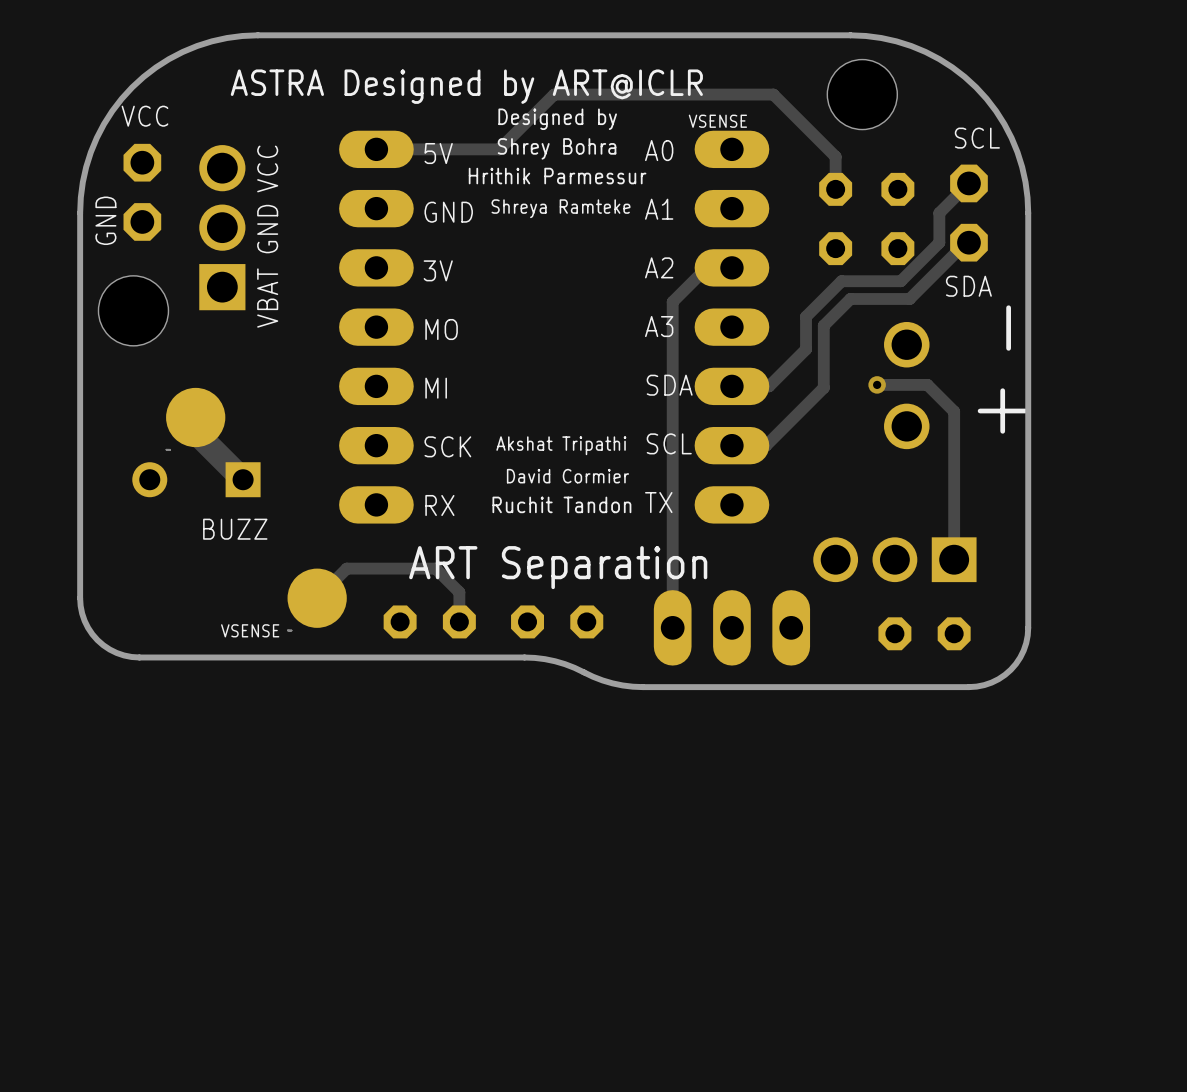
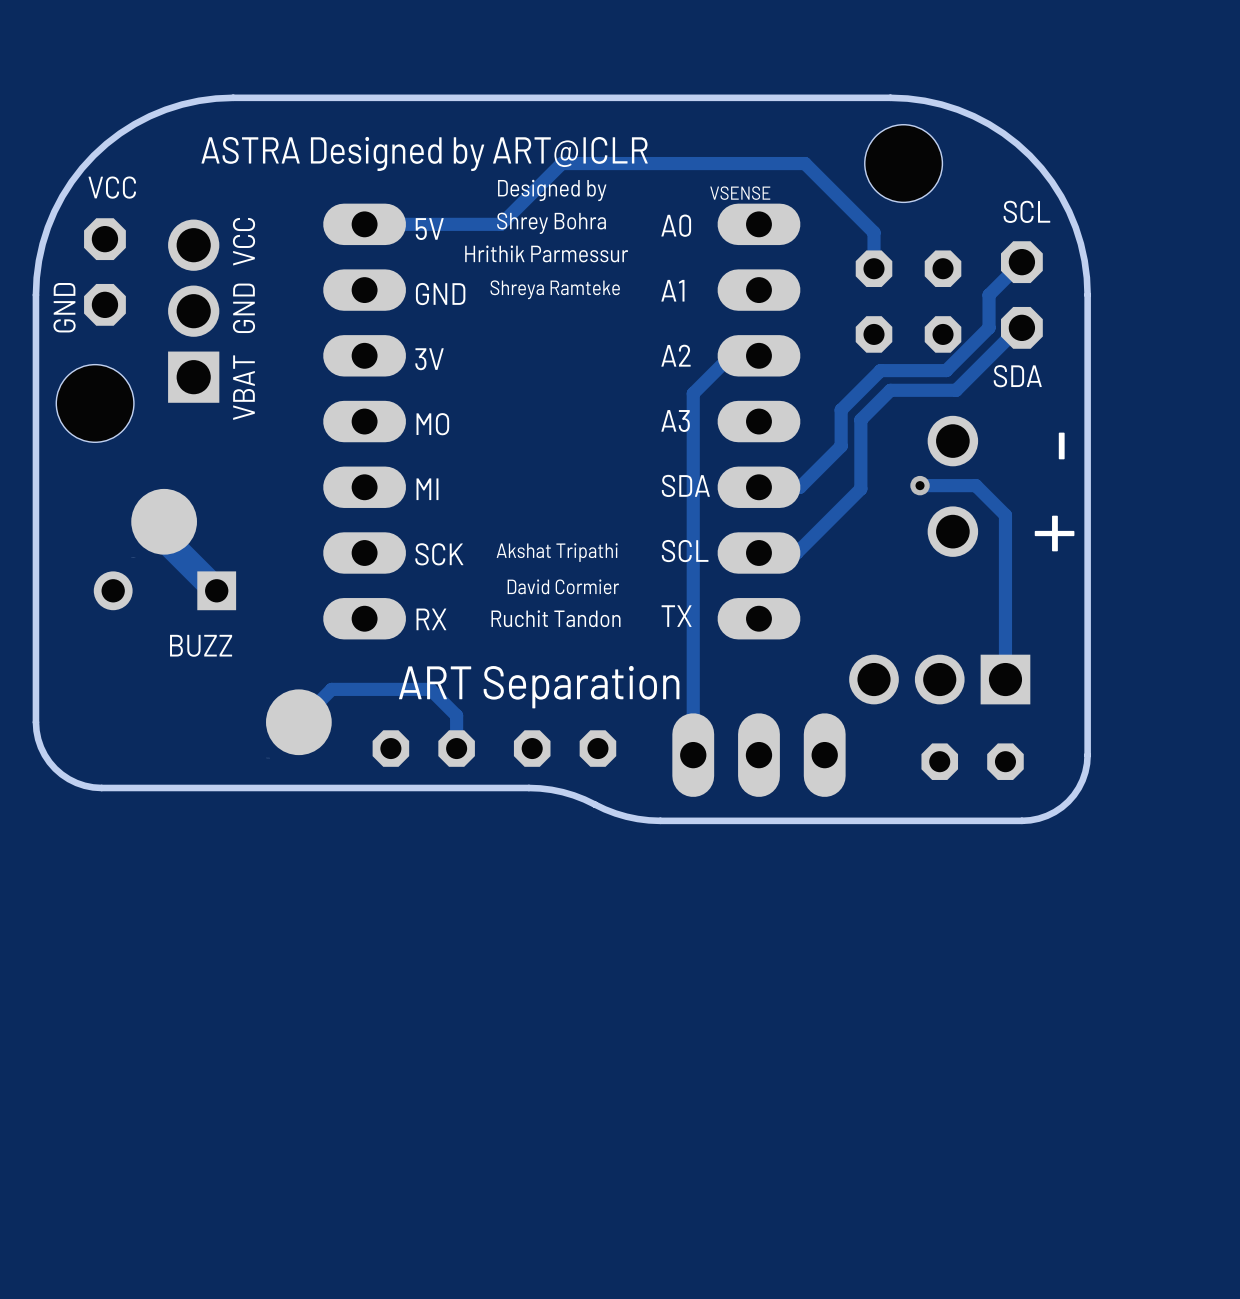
text: VSENSE (250, 630) -> none

